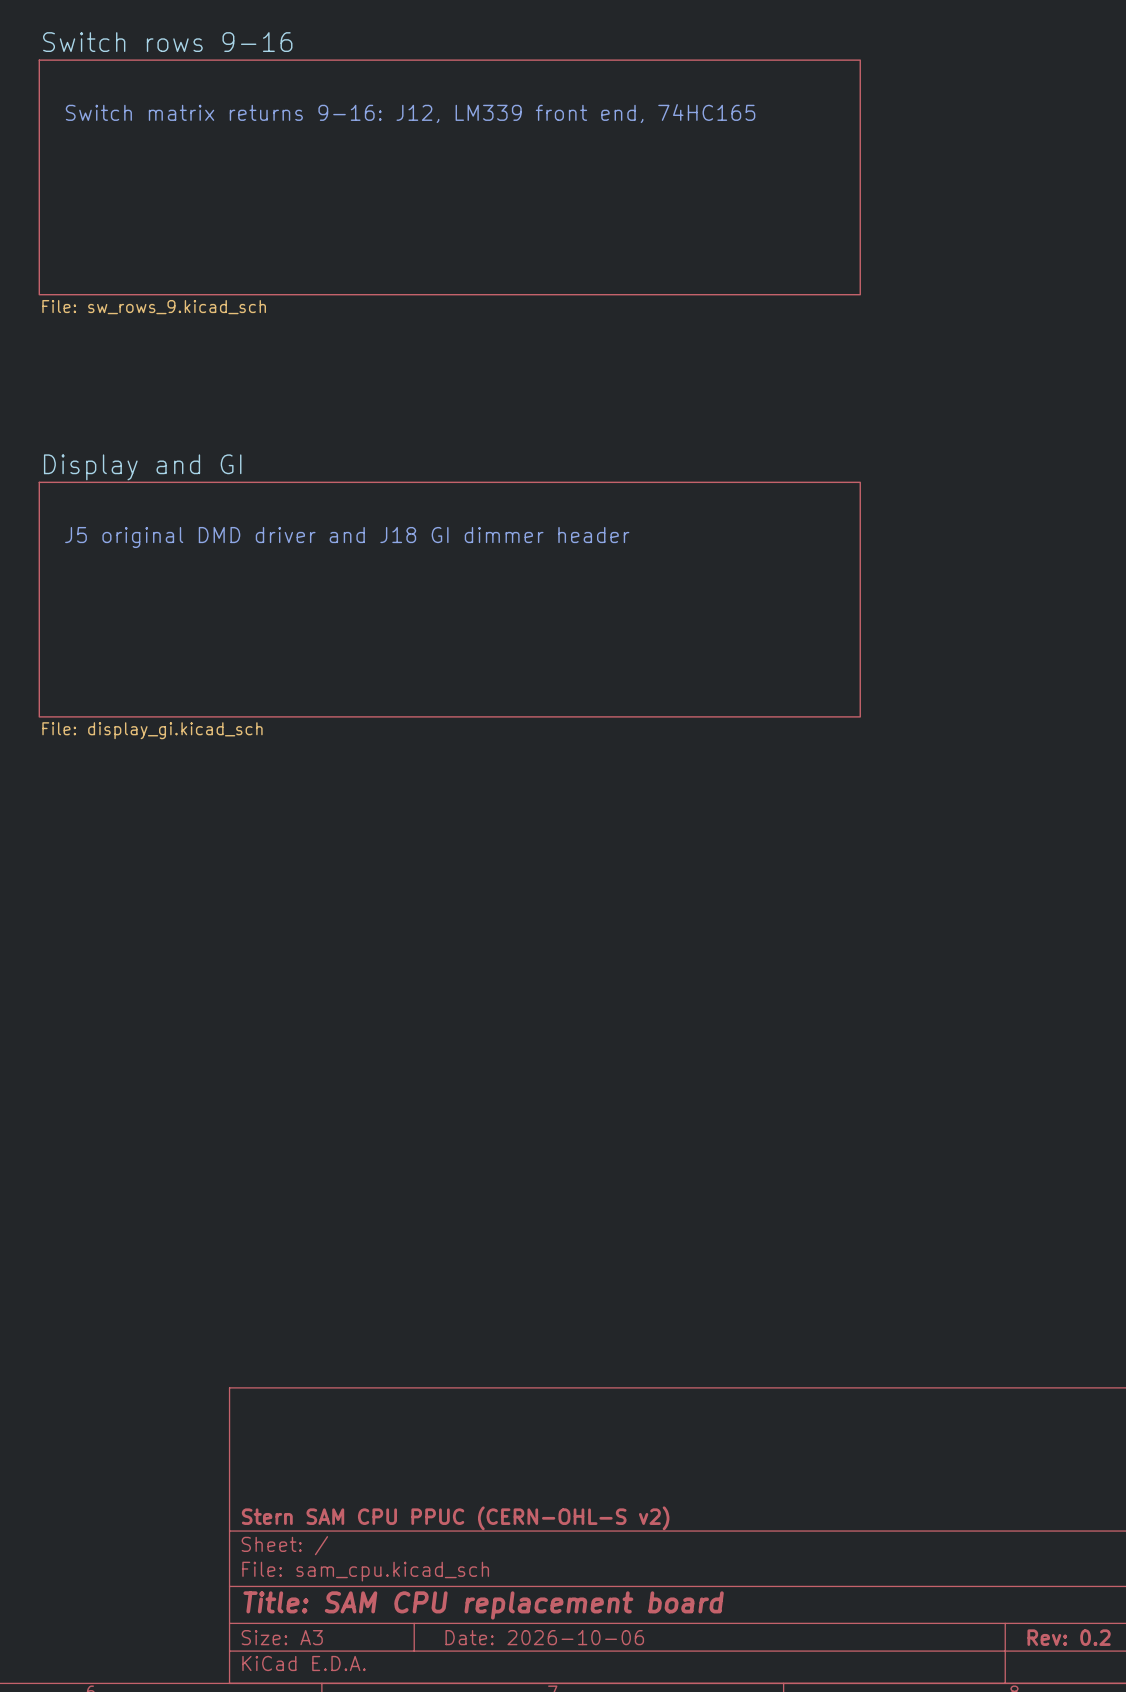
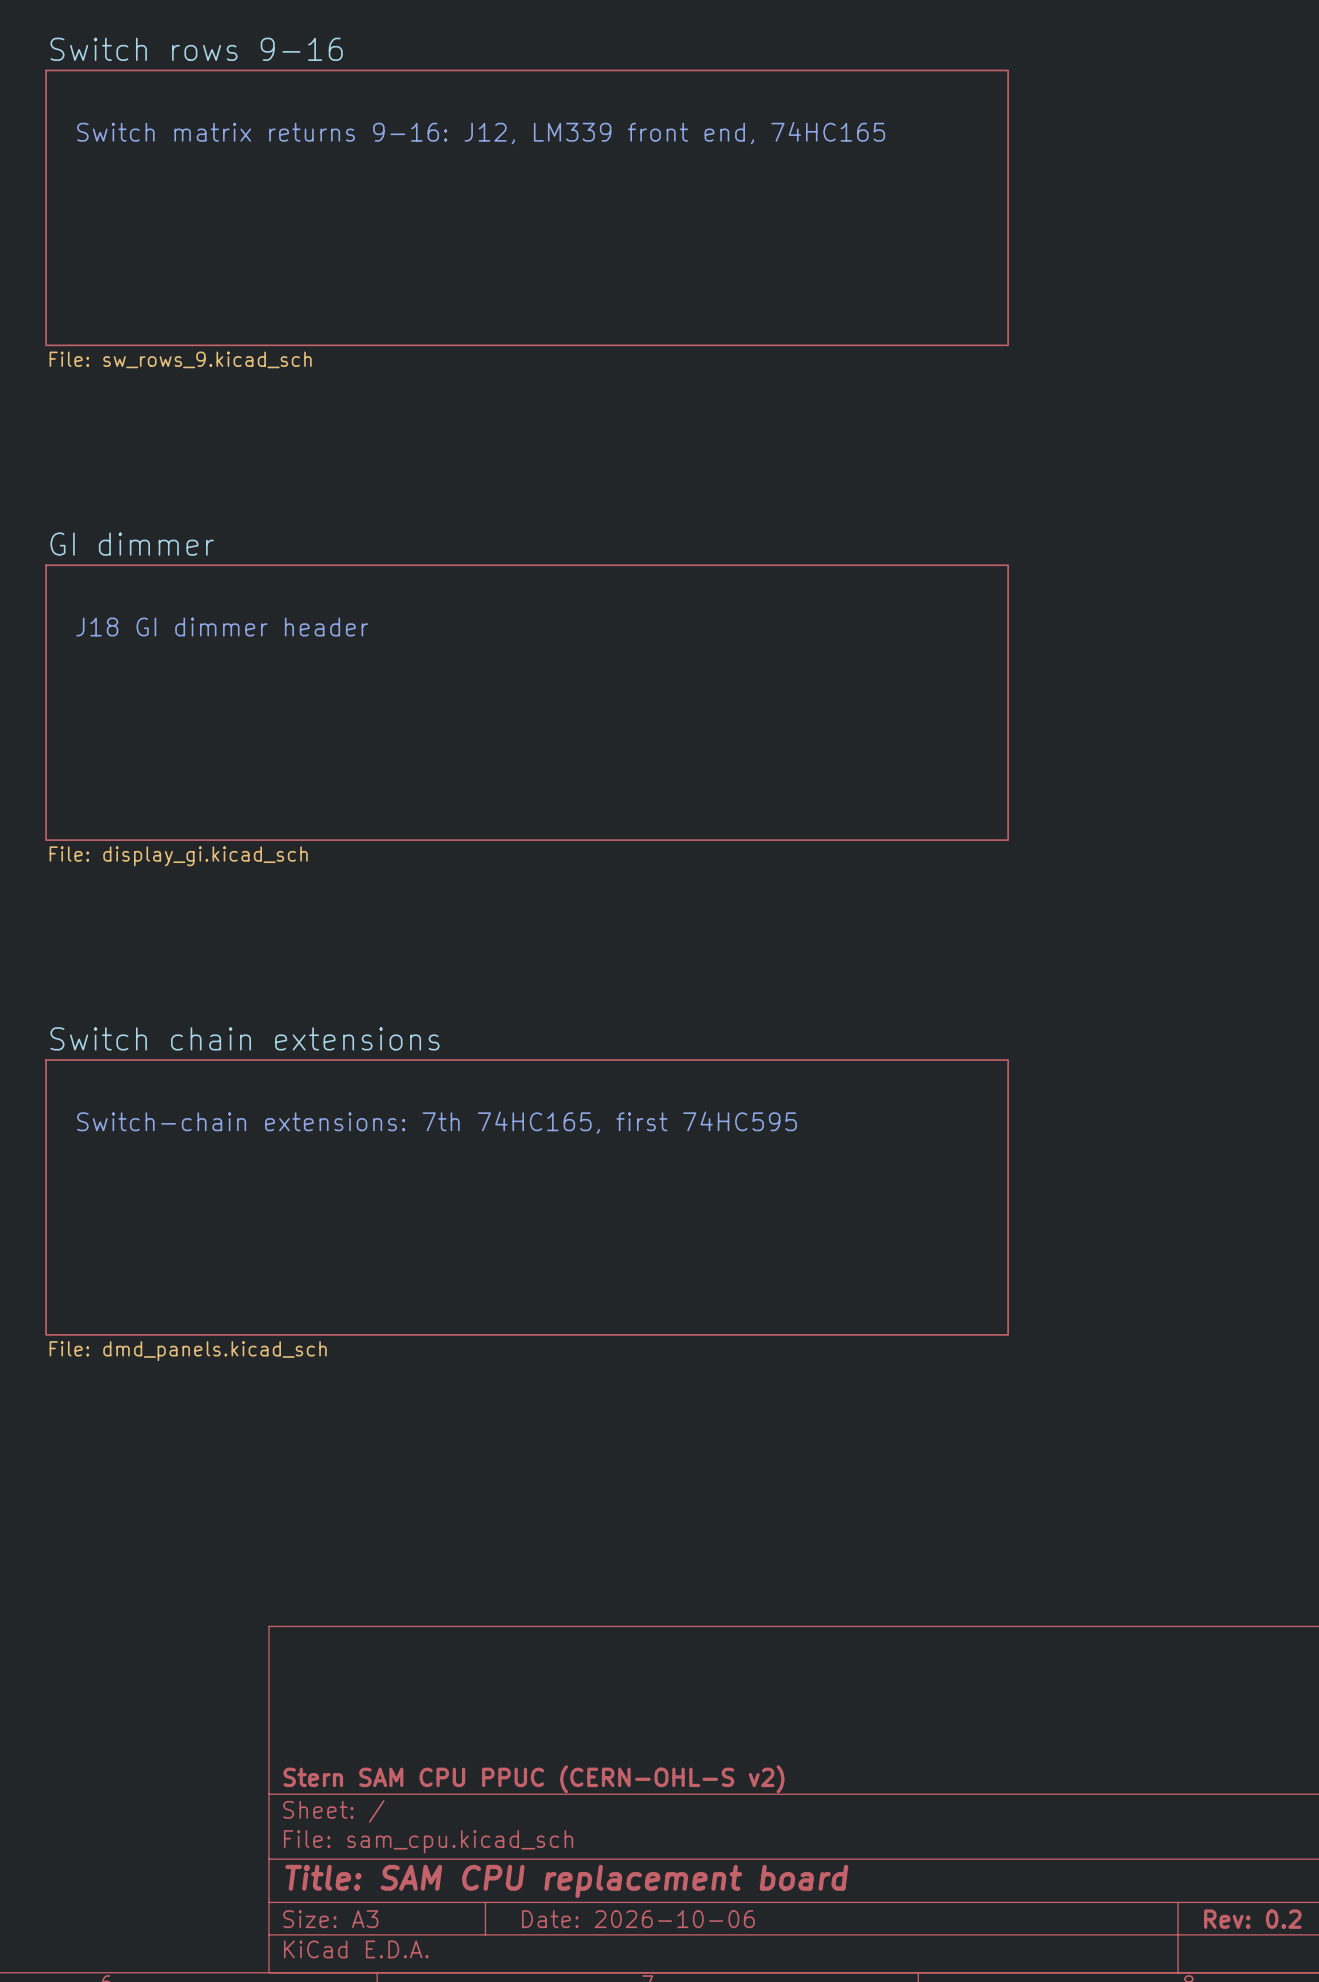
sheet Display and GI name: Display and GI (142, 467) -> GI dimmer (132, 544)
text: J5 original DMD driver and J18 GI dimmer header (347, 537) -> J18 GI dimmer header (222, 627)
text: none -> Switch-chain extensions: 7th 74HC165, first 74HC595 (437, 1122)
sheet Switch chain extensions: none -> File: dmd_panels.kicad_sch (527, 1197)

